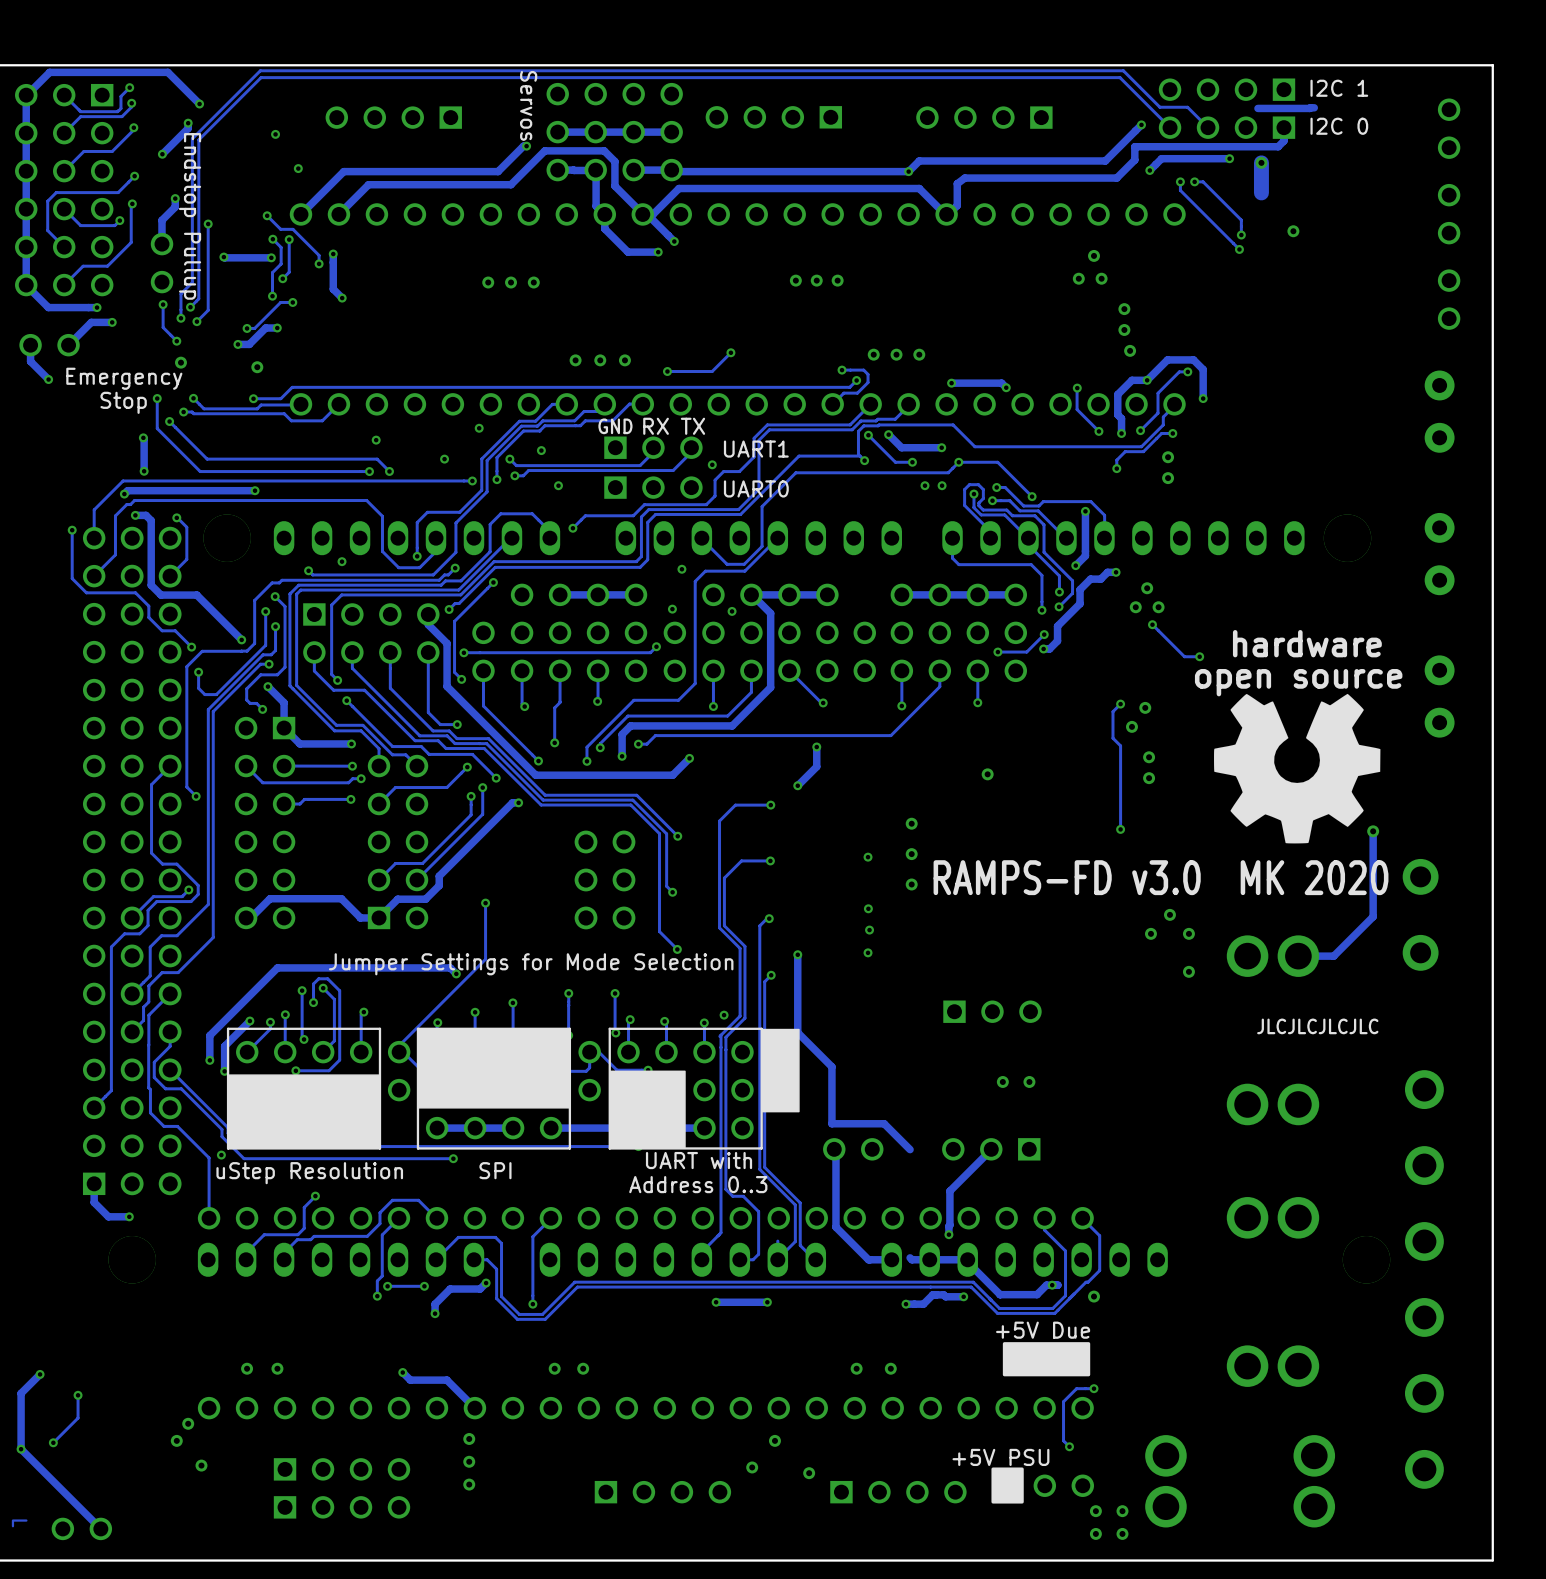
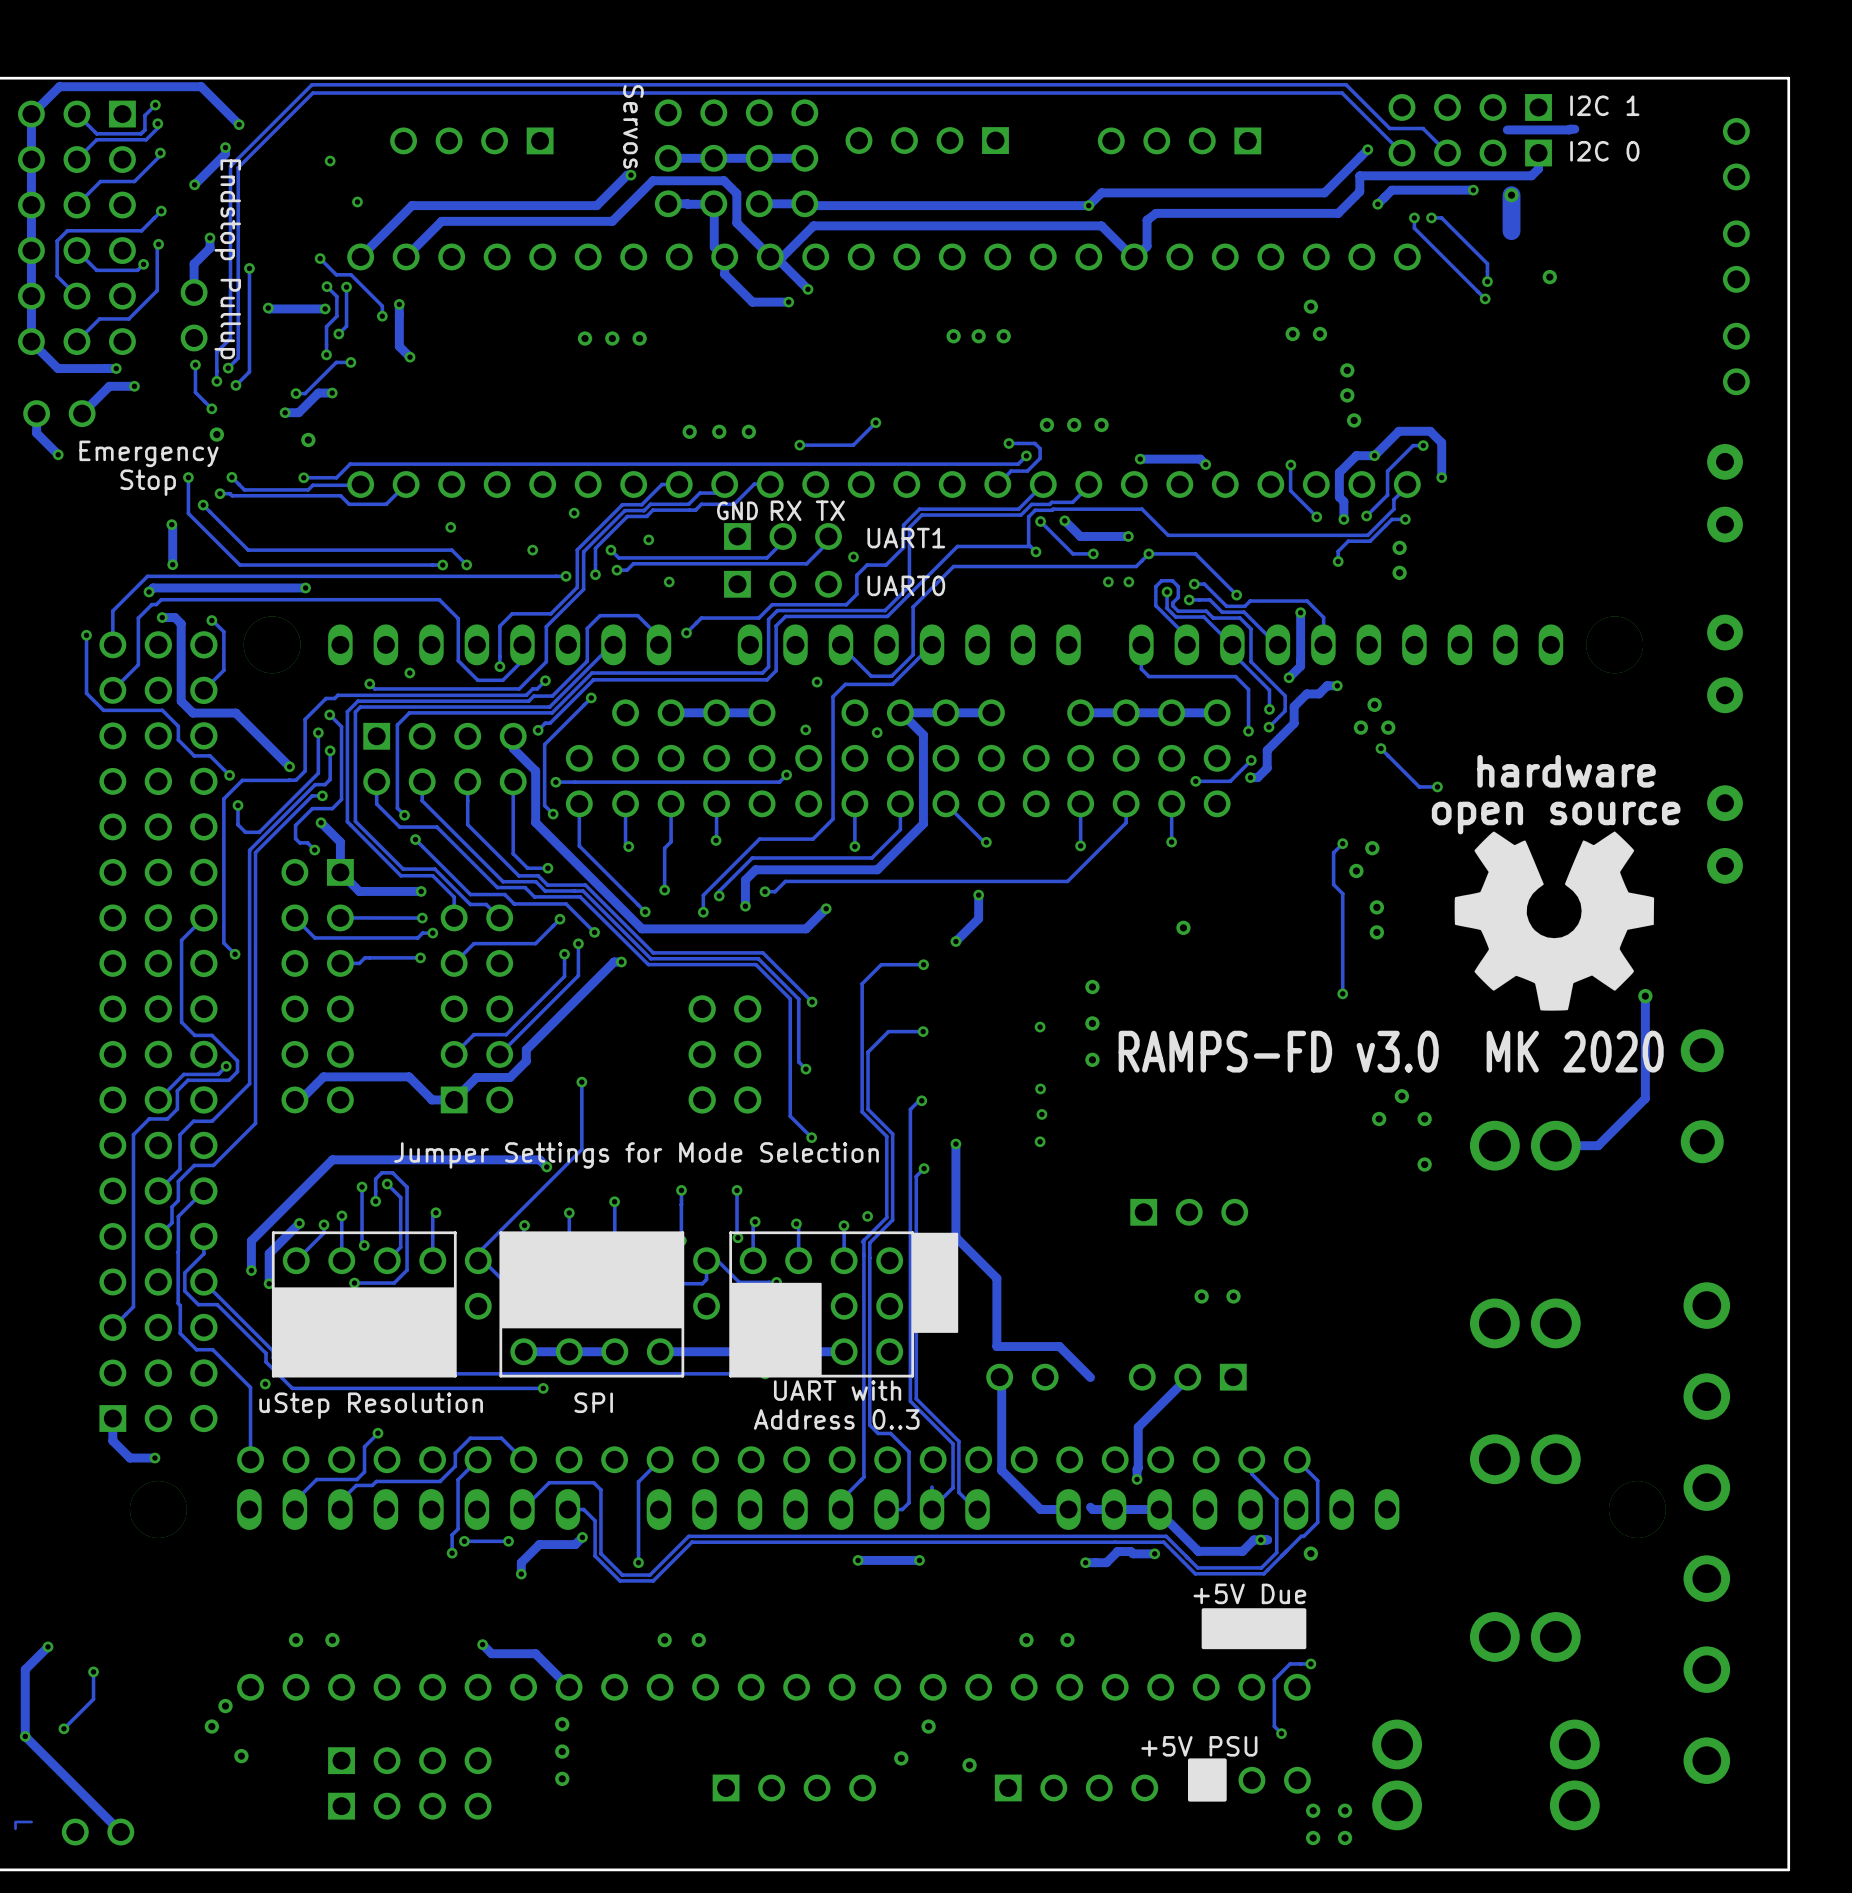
text: JLCJLCJLCJLC (1317, 1026) -> none

